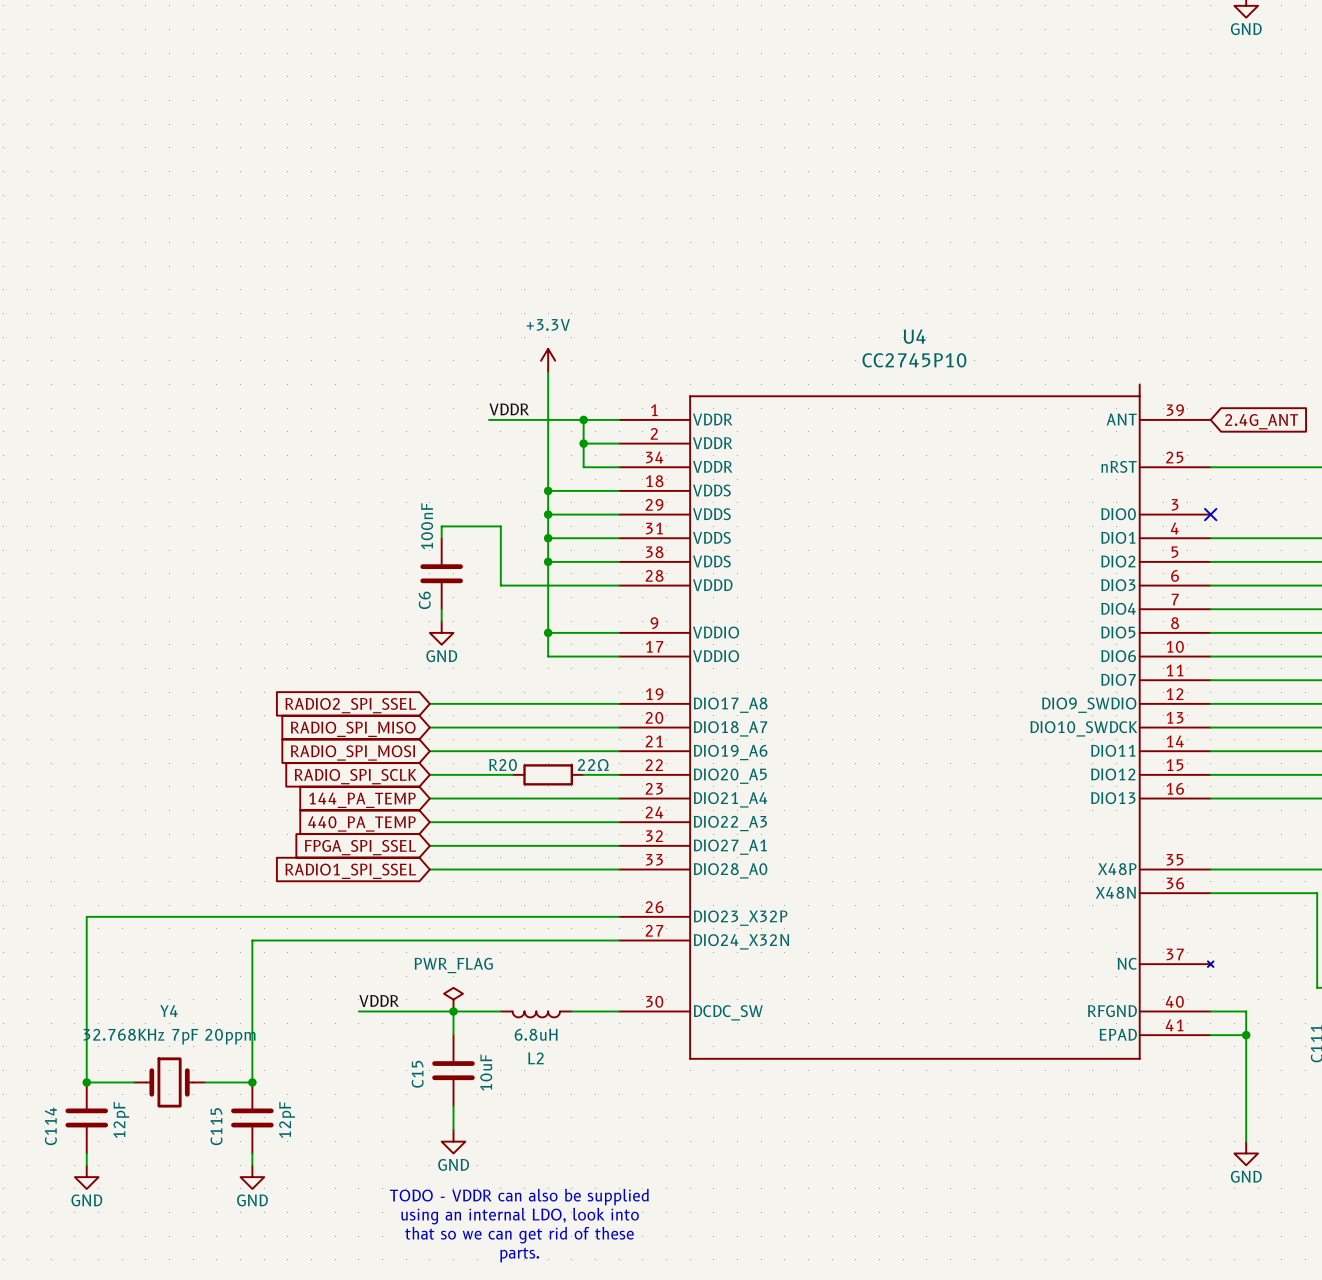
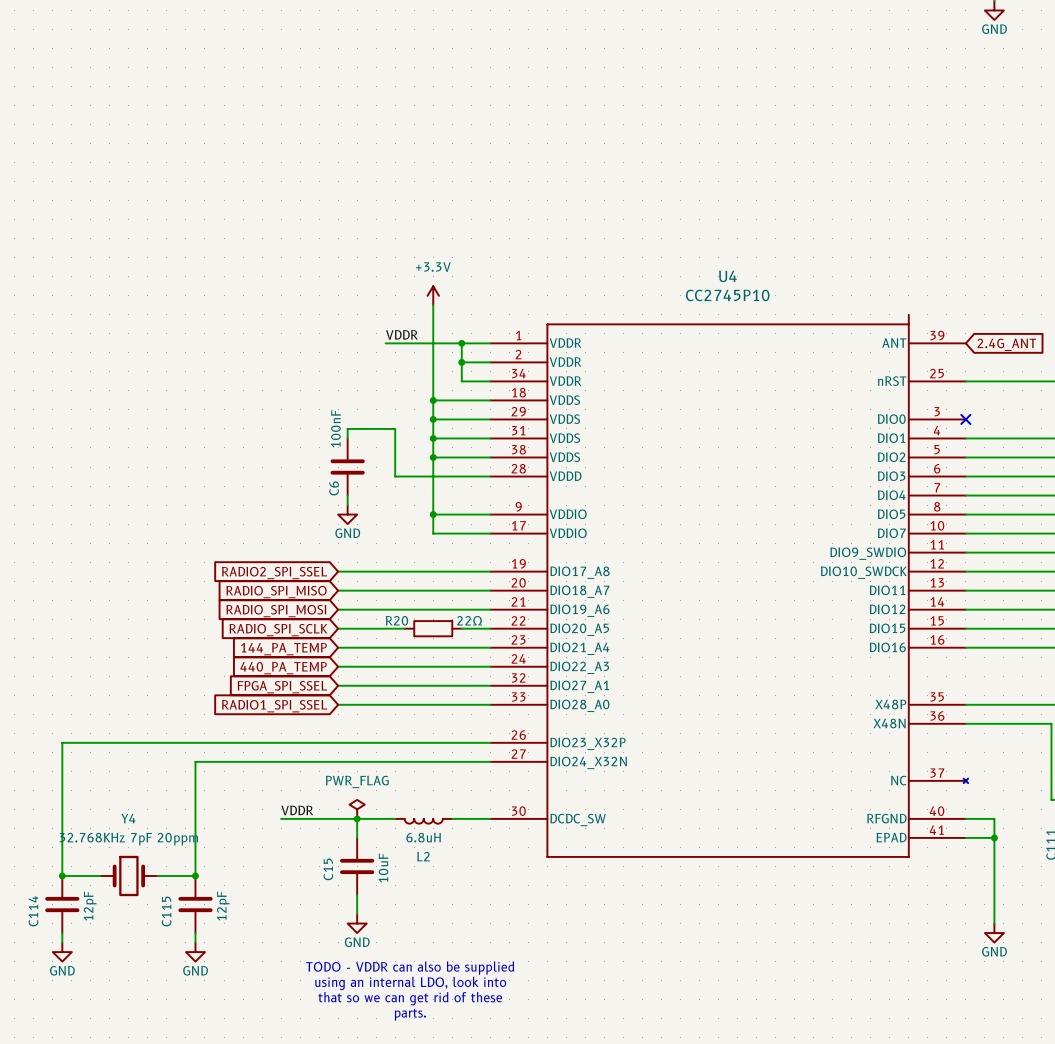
U4 pin name: DIO6 (1118, 656) -> DIO7 (891, 533)
U4 pin name: DIO7 (1118, 679) -> DIO9_SWDIO (868, 553)
U4 pin name: DIO9_SWDIO (1089, 705) -> DIO10_SWDCK (863, 572)
U4 pin name: DIO10_SWDCK (1083, 728) -> DIO11 (887, 590)
U4 pin name: DIO11 (1113, 750) -> DIO12 (887, 609)
U4 pin name: DIO12 (1113, 774) -> DIO15 (887, 628)
U4 pin name: DIO13 (1113, 798) -> DIO16 (887, 647)

